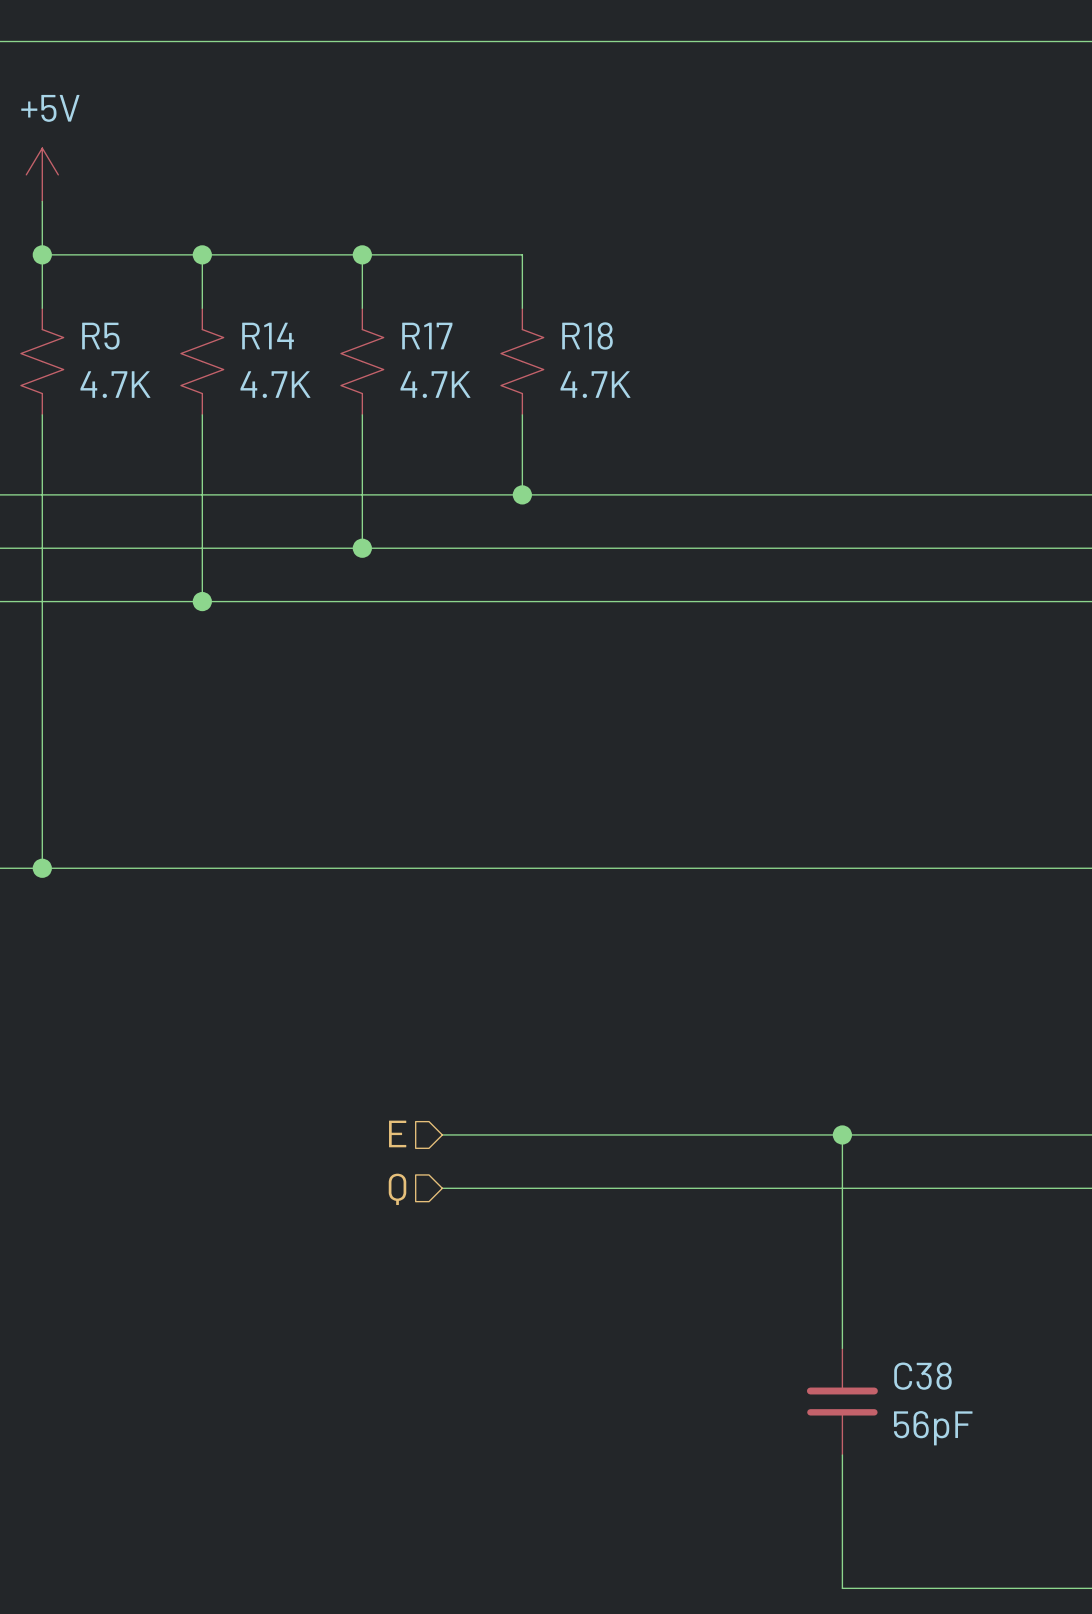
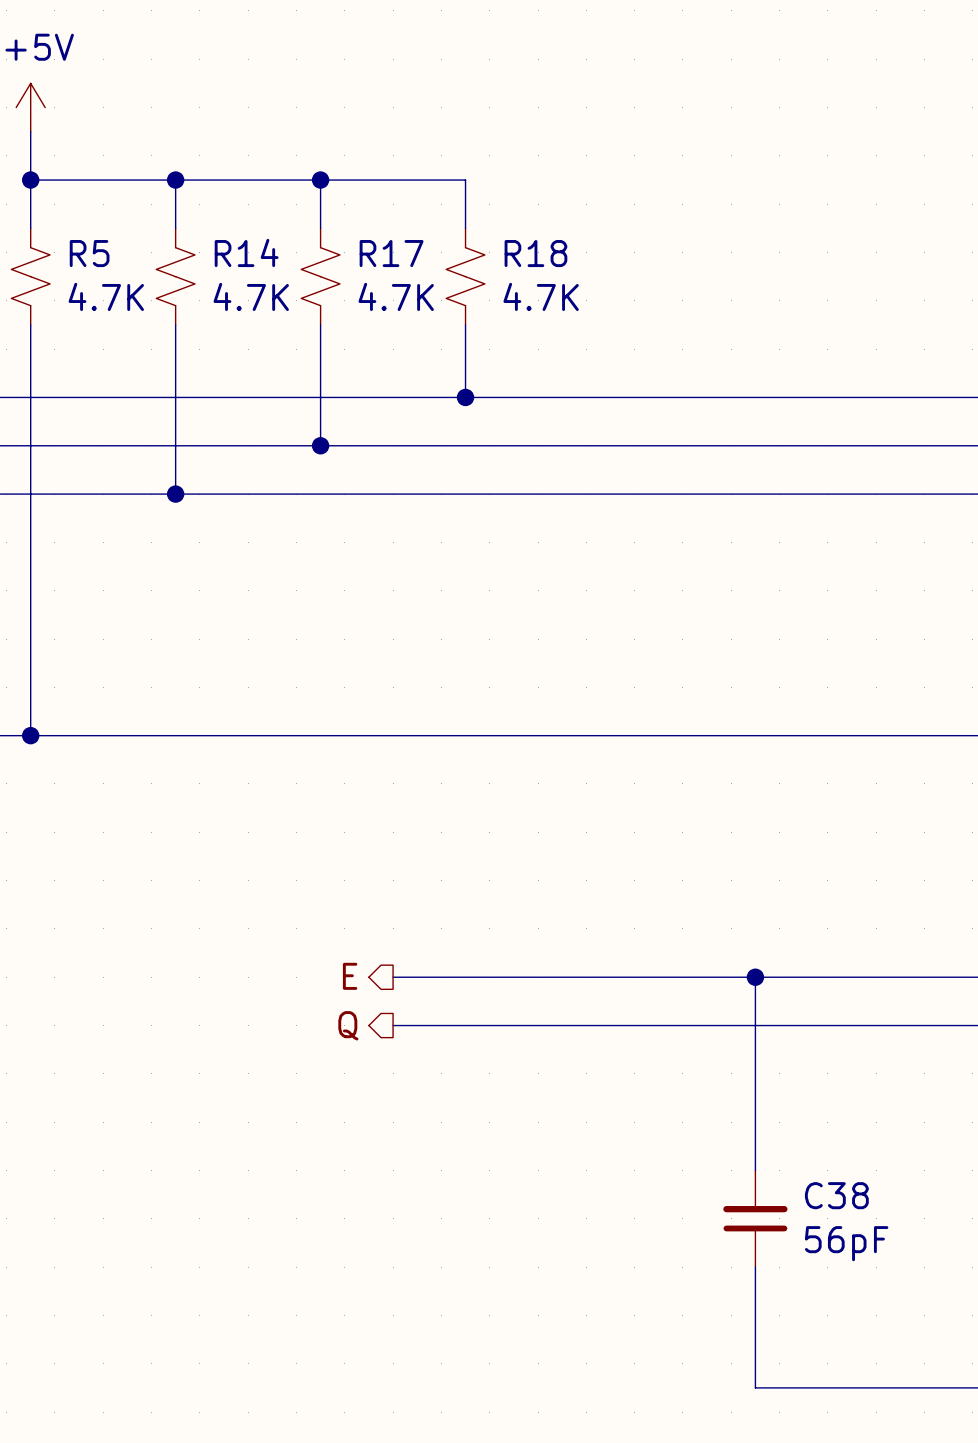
hierarchical label shape: input (397, 1133) -> output (350, 976)
hierarchical label shape: input (397, 1189) -> output (348, 1025)

